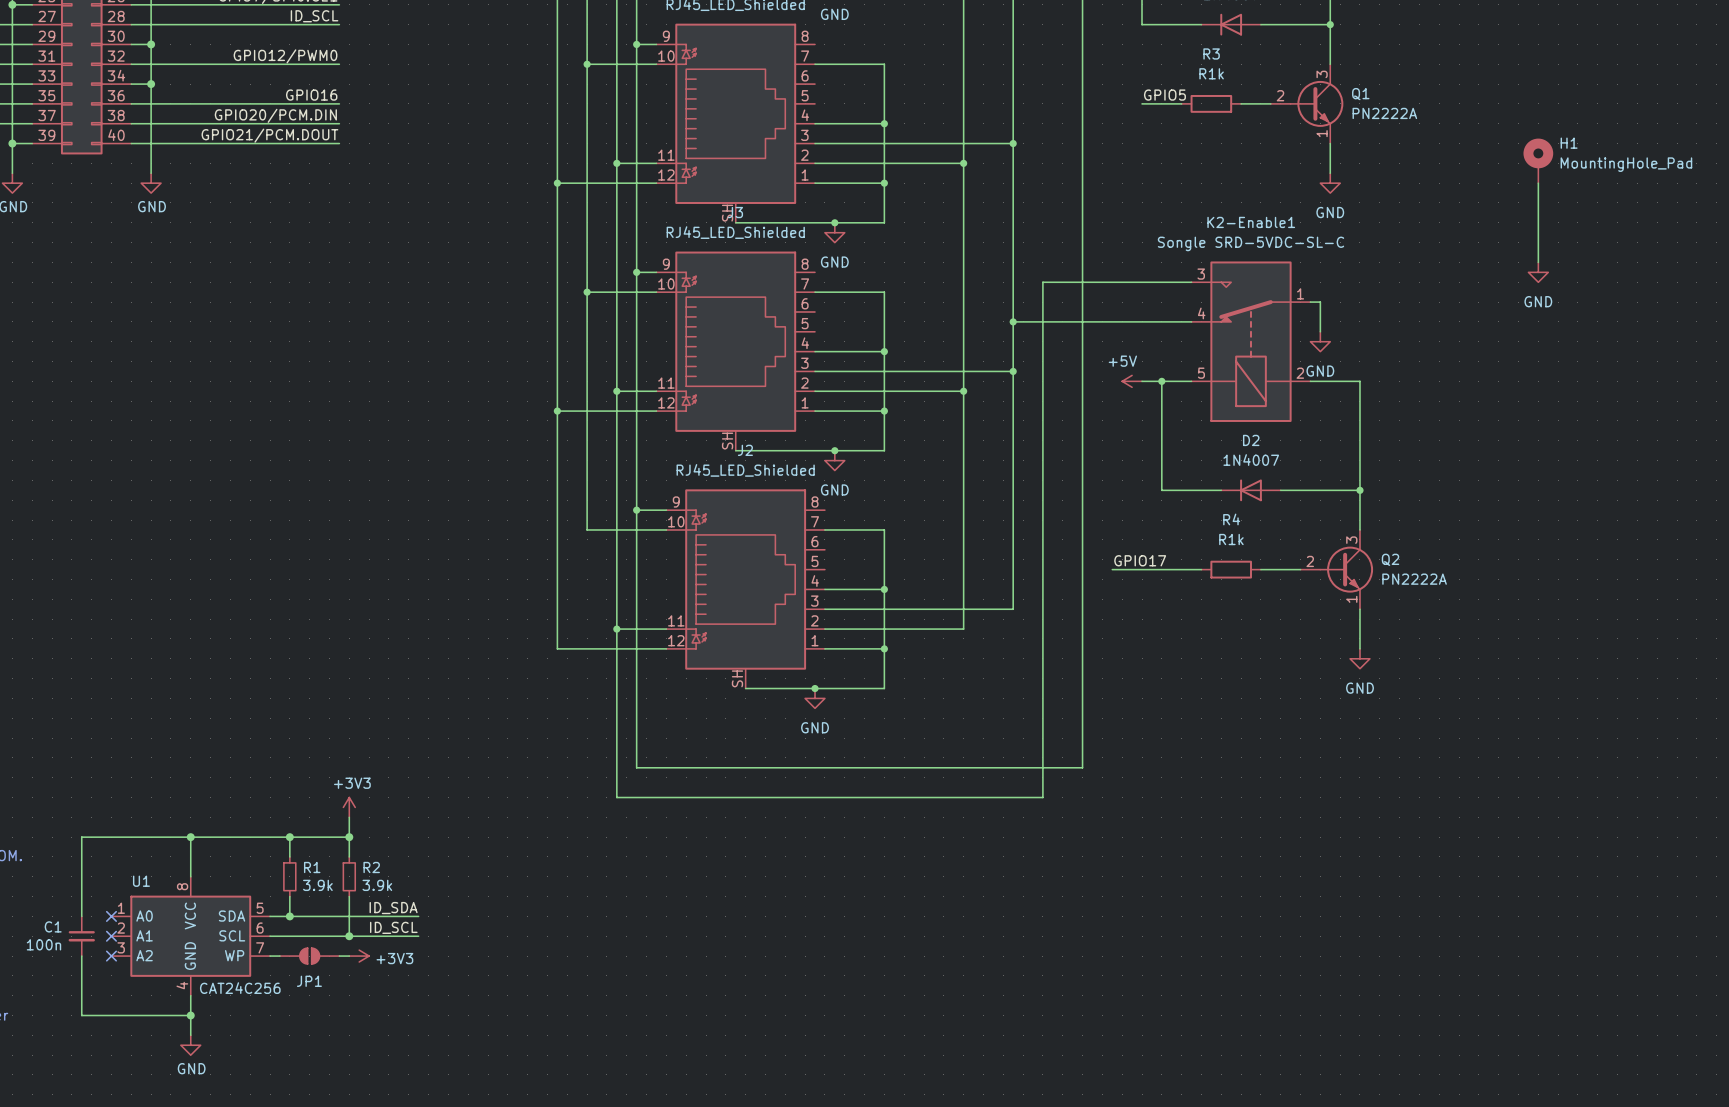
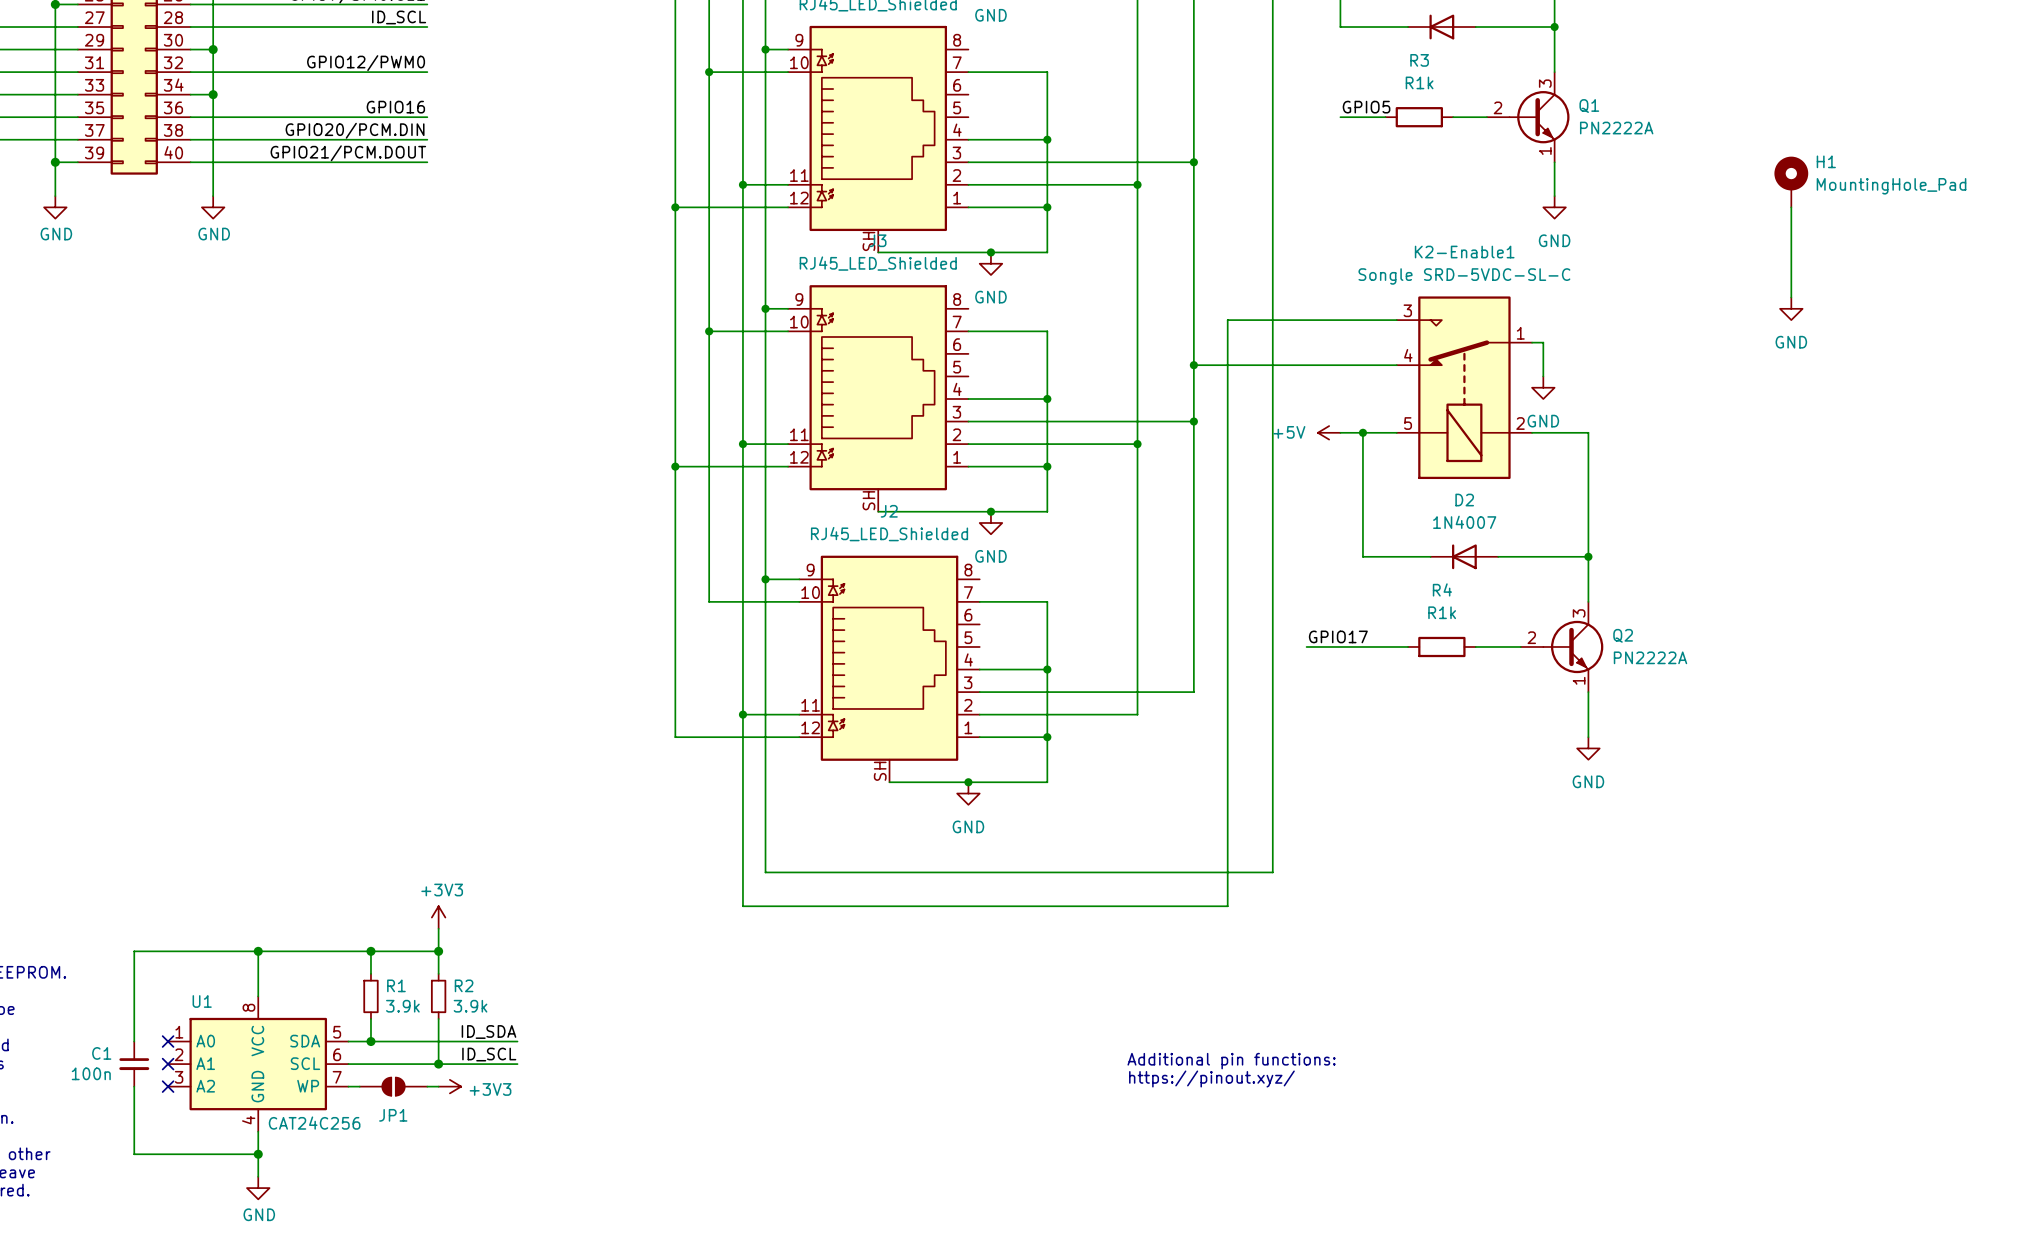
power symbol text position: +5V (1122, 361) -> +5V (1289, 432)
text: none -> Additional pin functions: (1231, 1061)
text: none -> https://pinout.xyz/ (1211, 1078)

